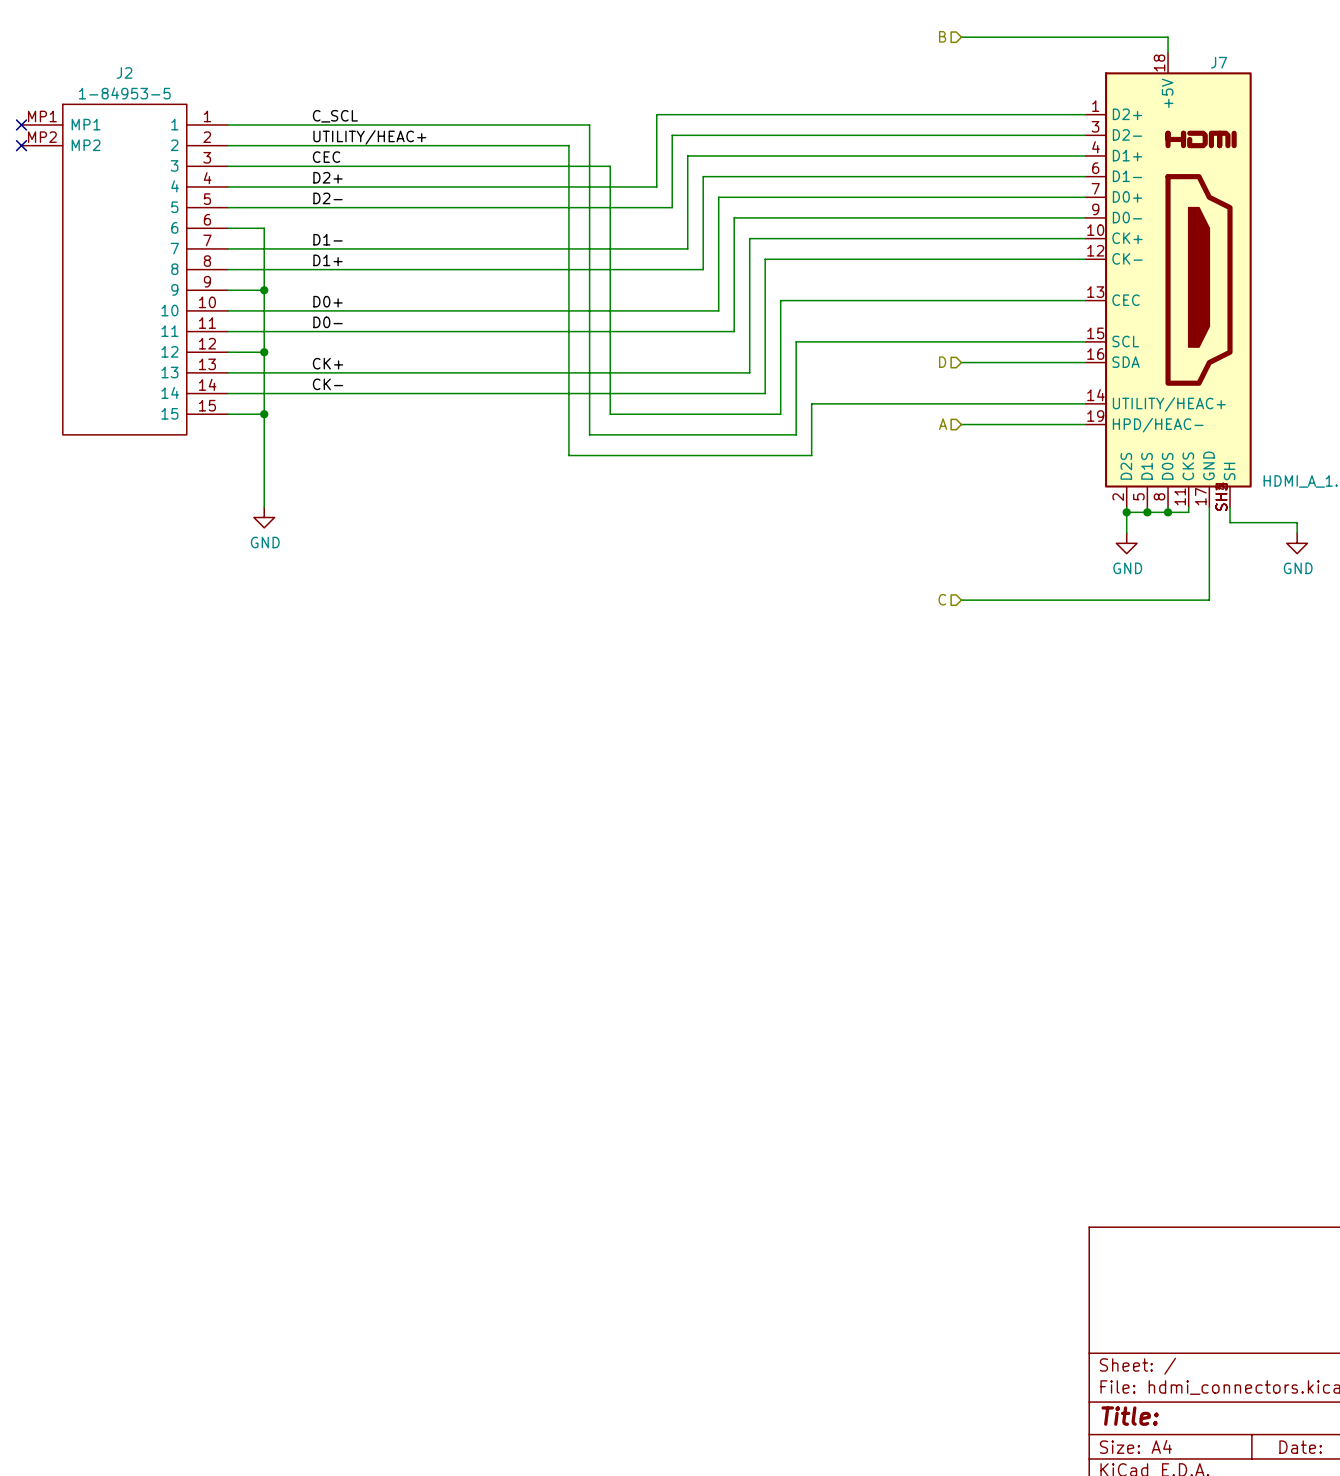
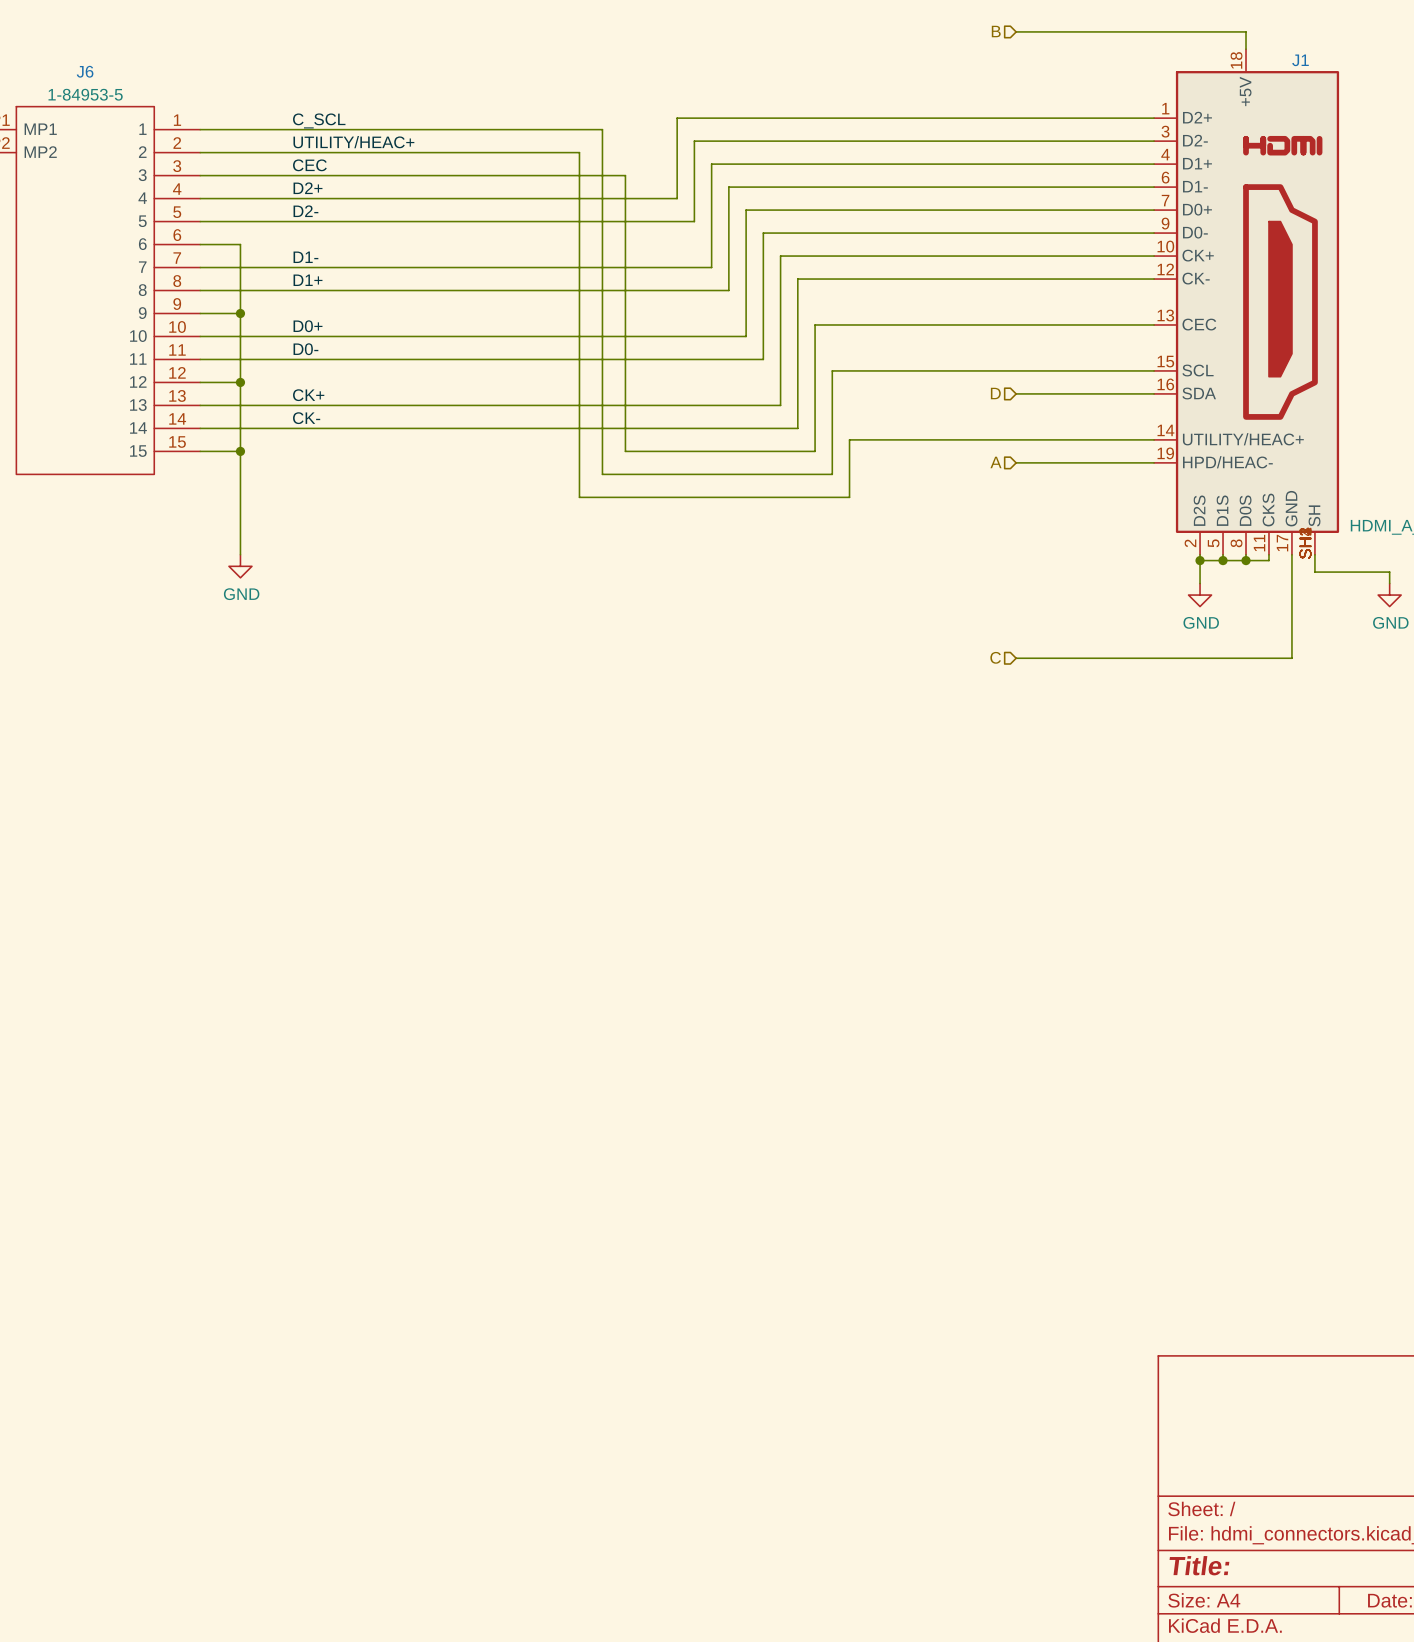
J7 name: J7 (1219, 62) -> J1 (1300, 60)
J2 name: J2 (124, 72) -> J6 (85, 71)

